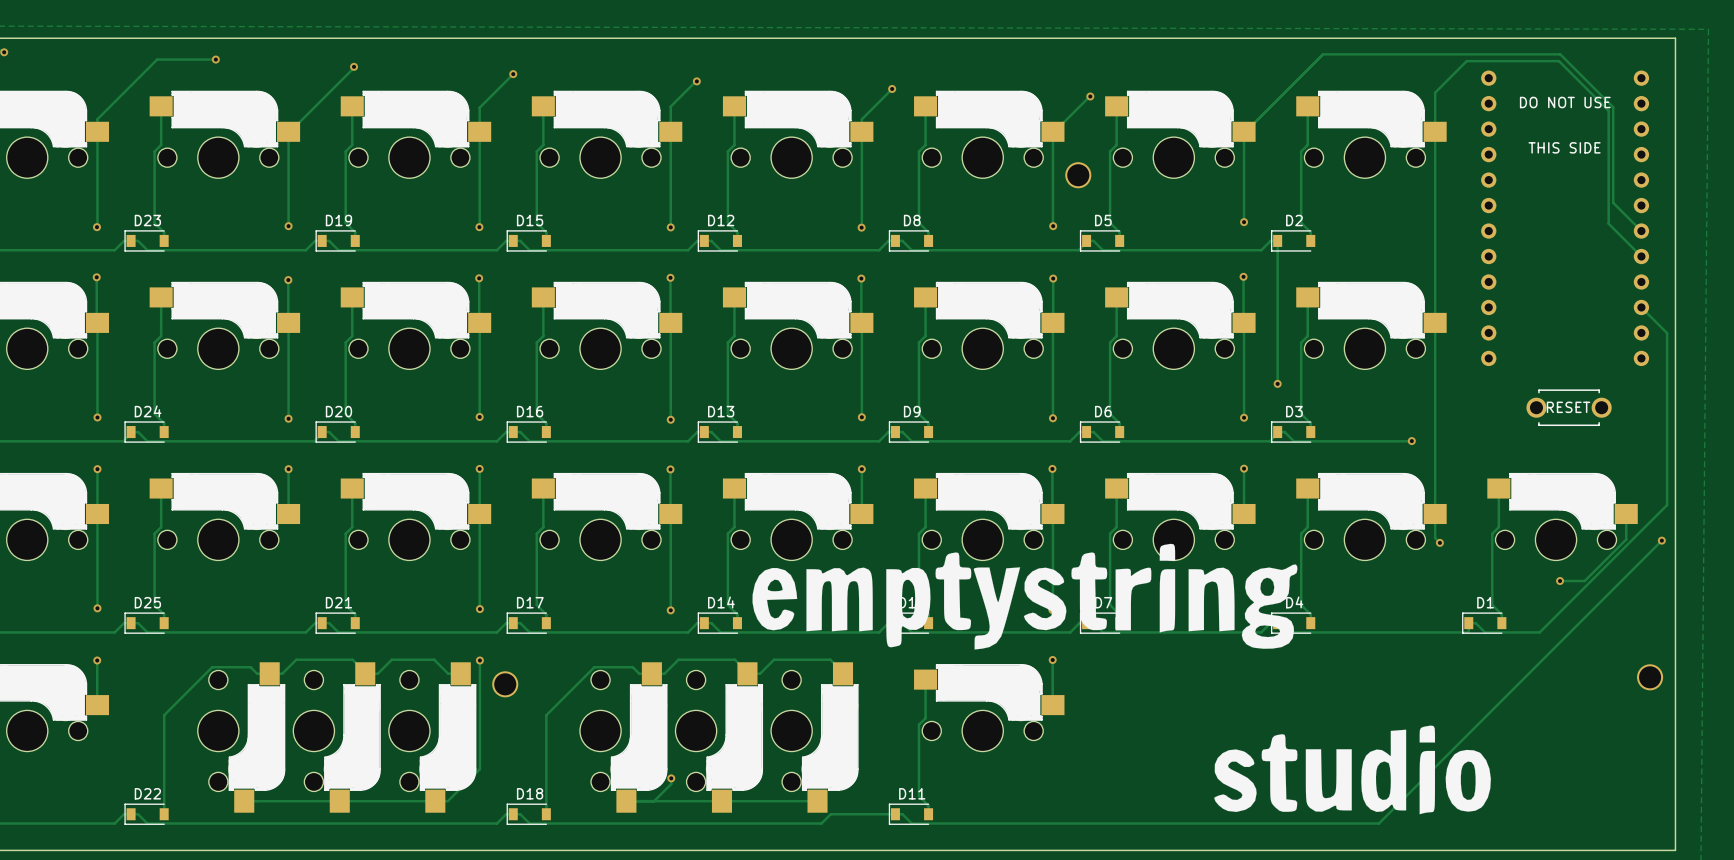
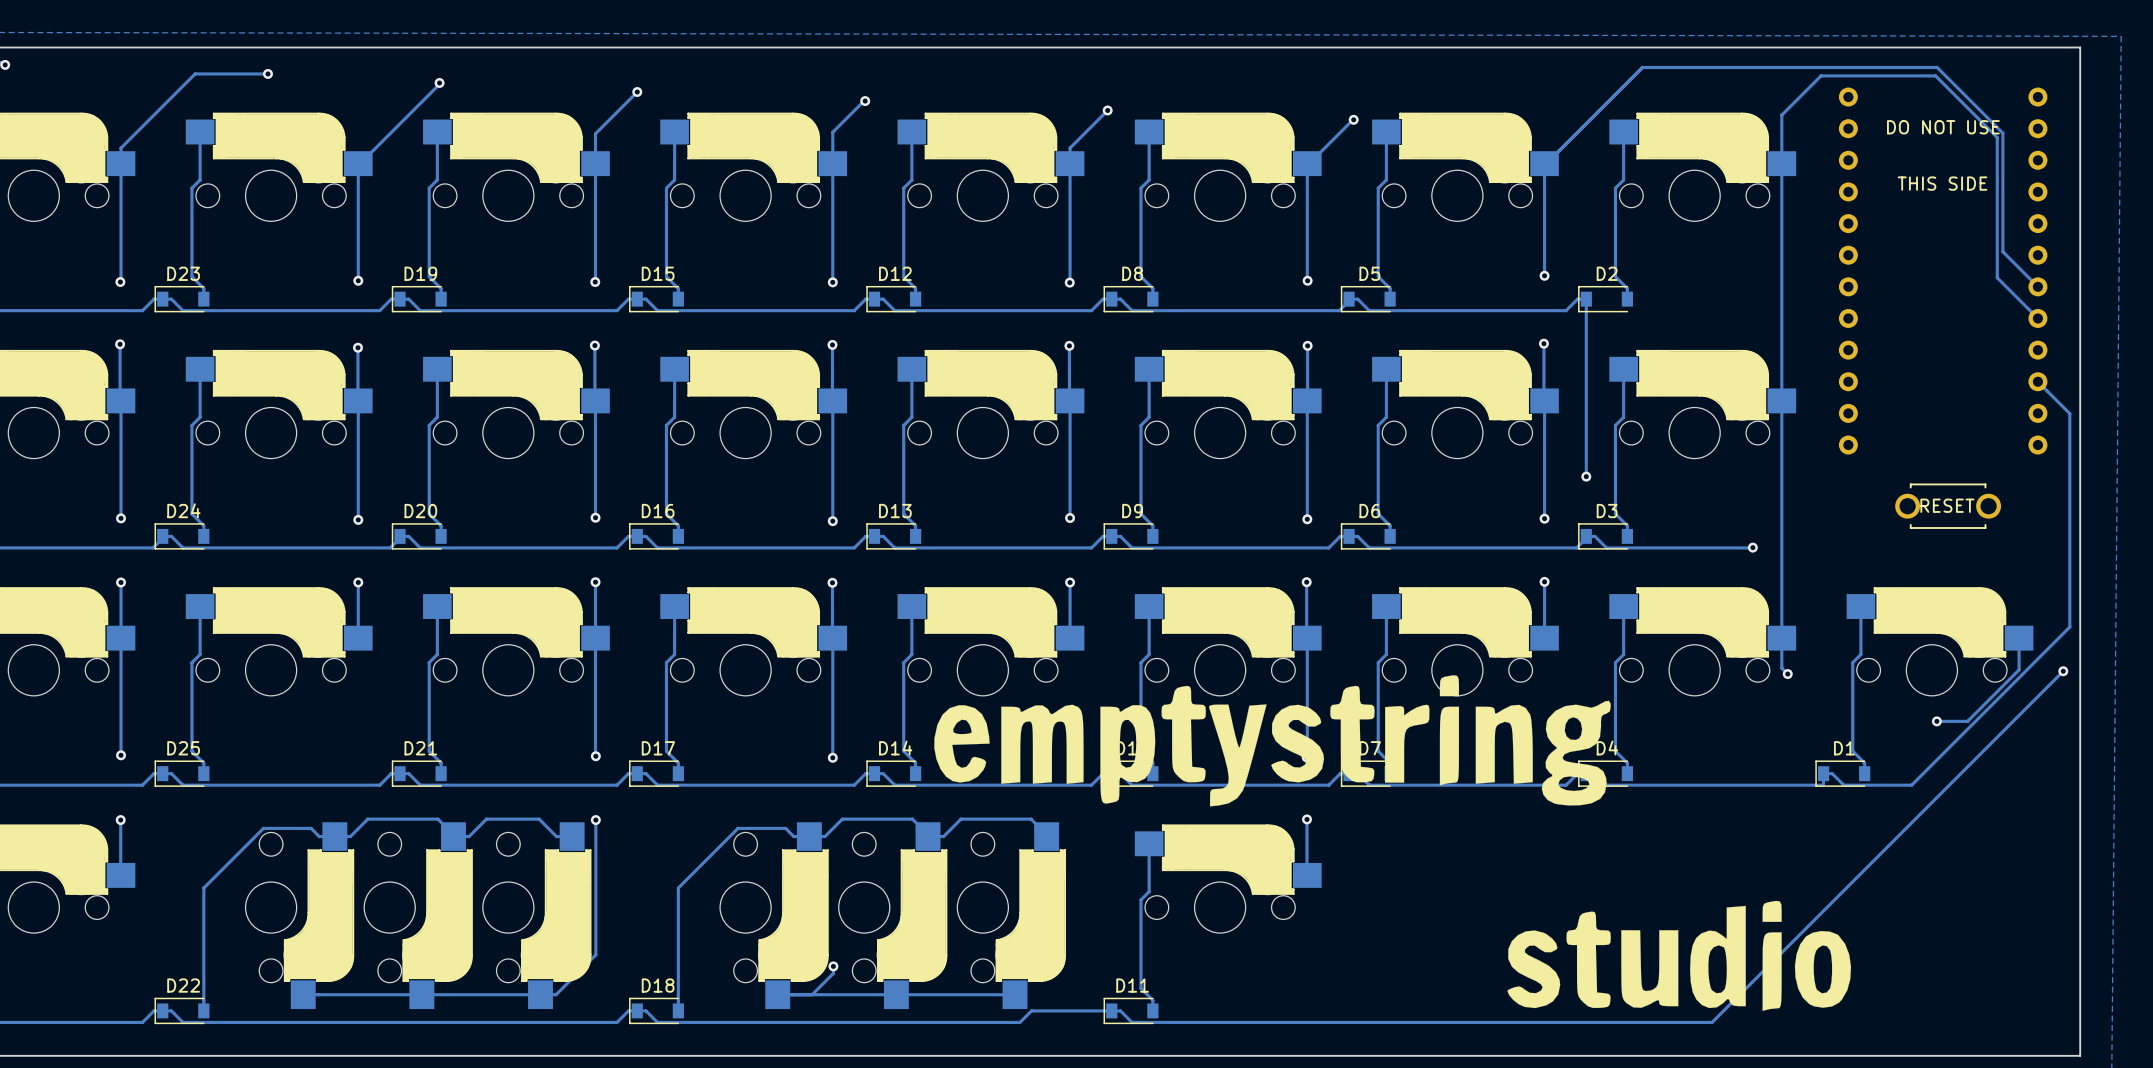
part: (1078, 175) -> none
part: (1650, 677) -> none
part: (505, 684) -> none

